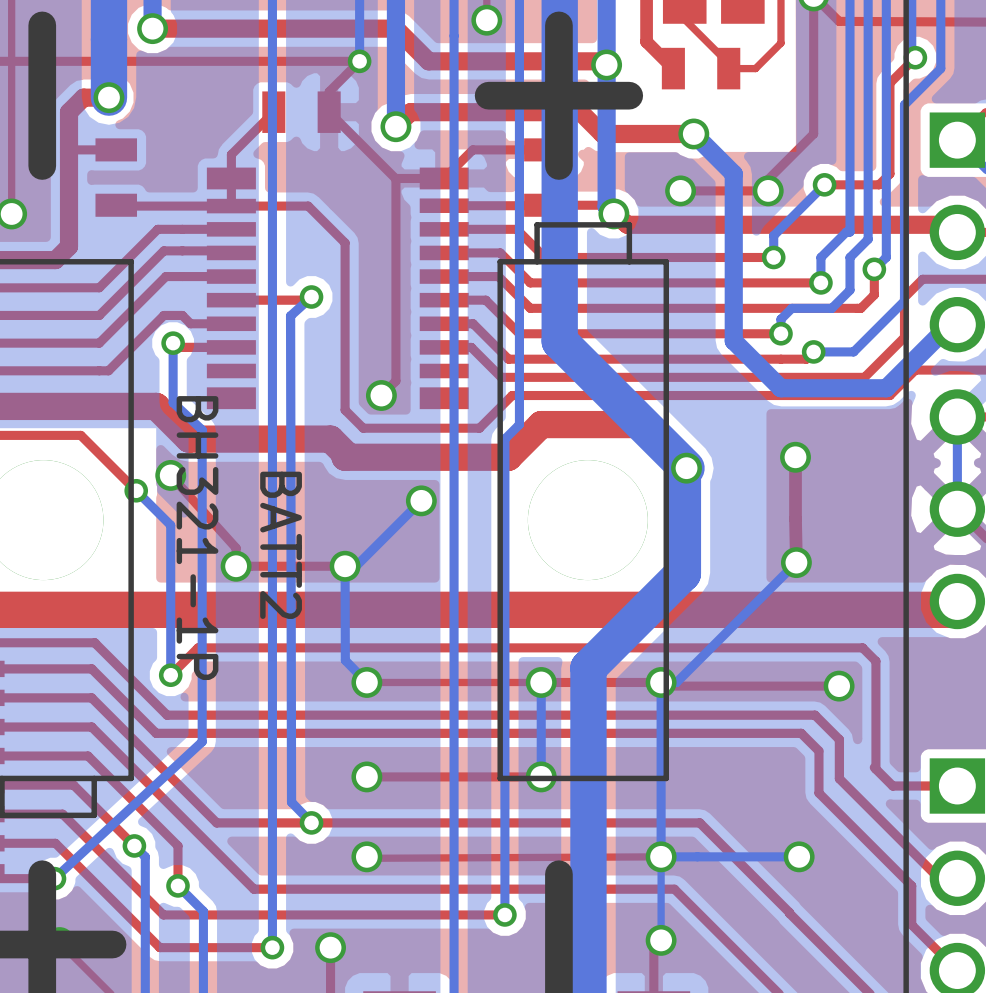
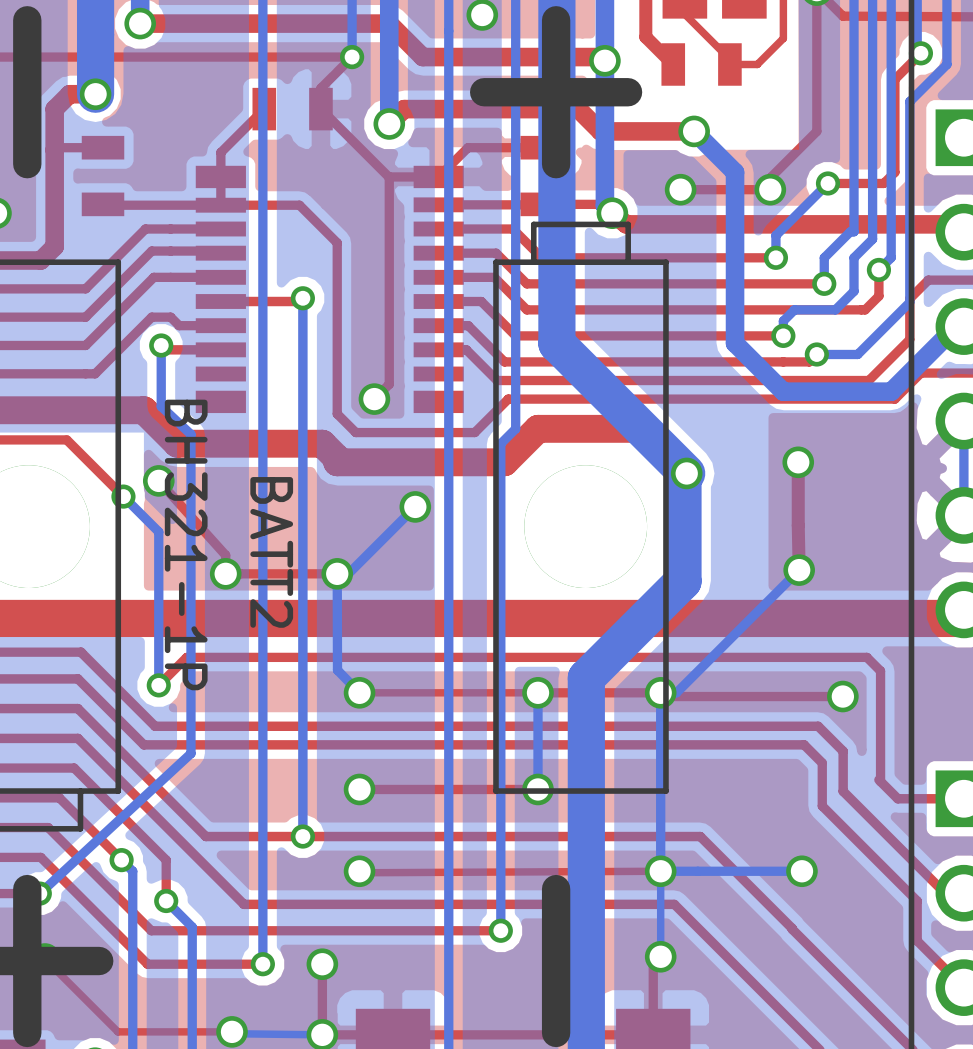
bottom track: (311, 297) (290, 315) (291, 802) (311, 822) -> (302, 298) (302, 836)

